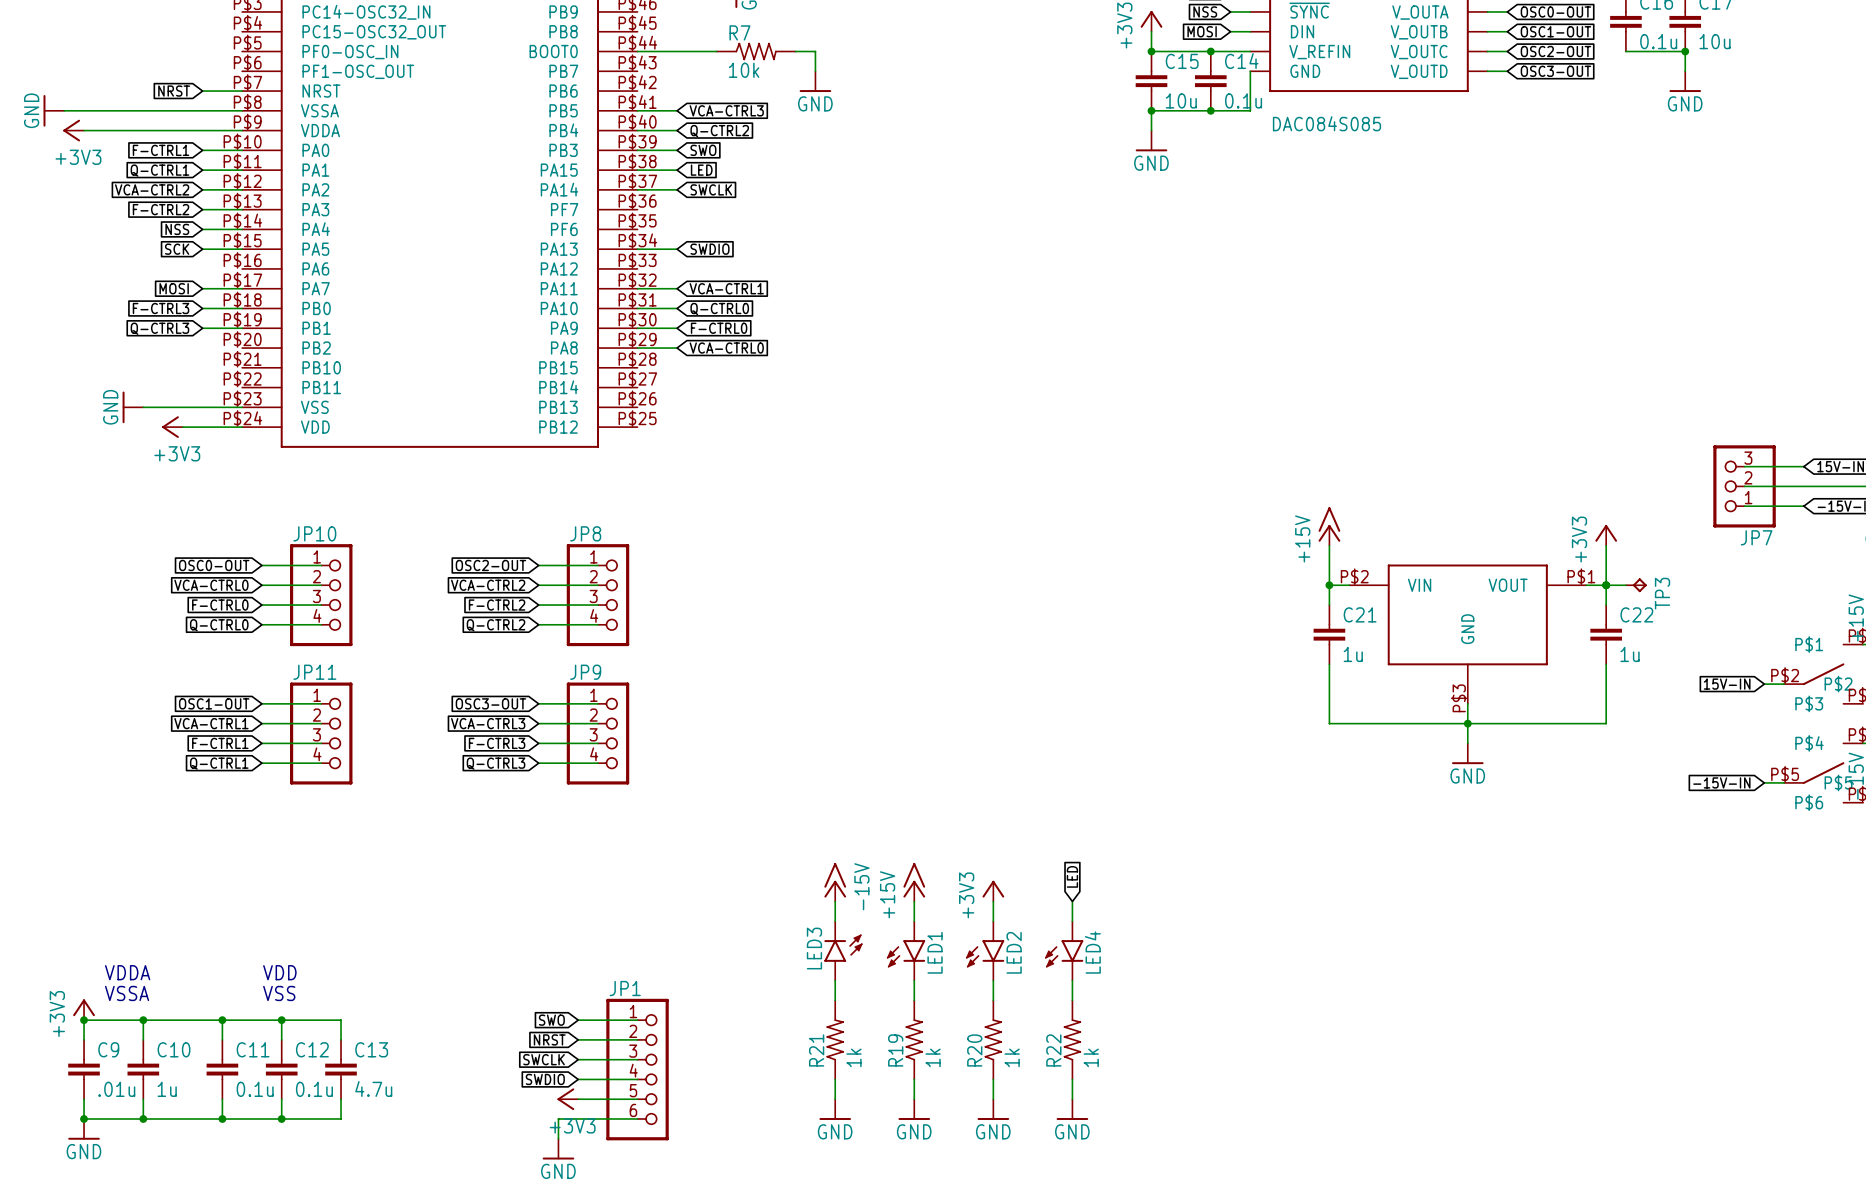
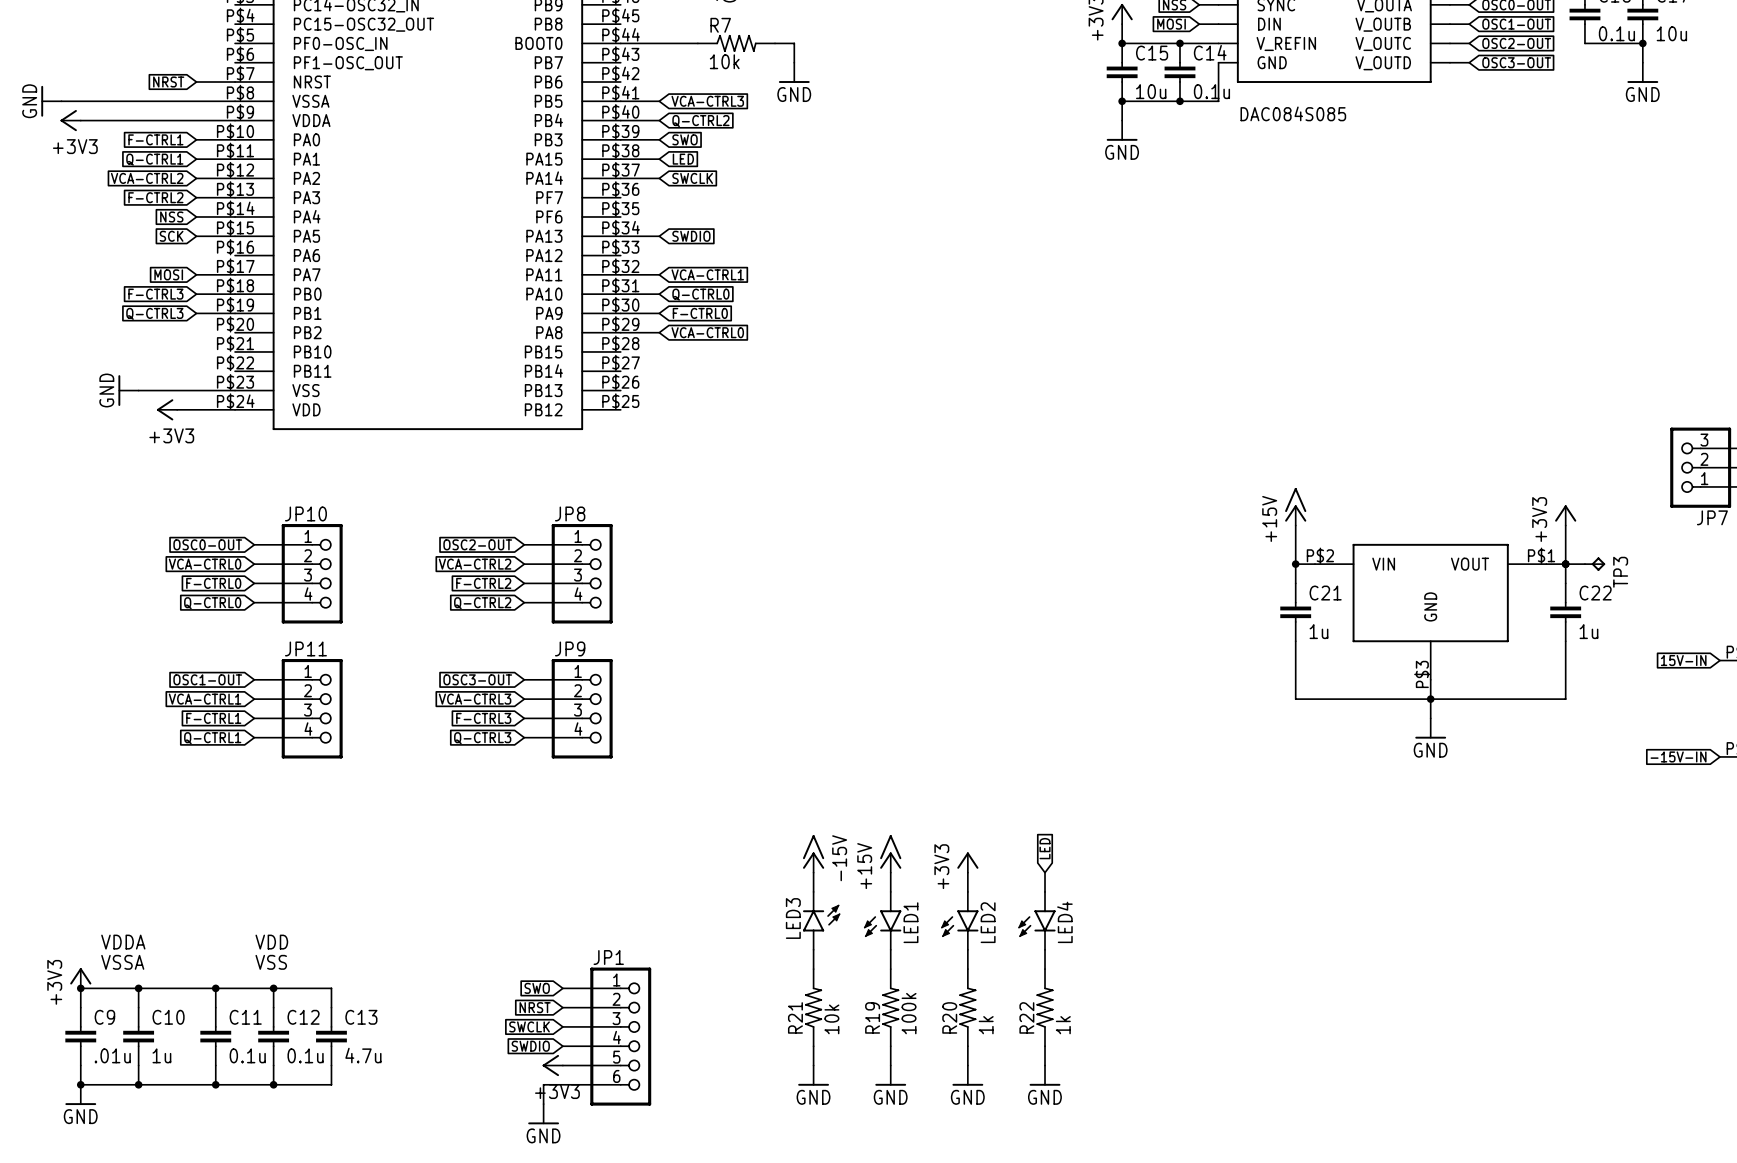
R21 value: 1k (853, 1057) -> 10k (831, 1019)
R19 value: 1k (933, 1057) -> 100k (909, 1013)

